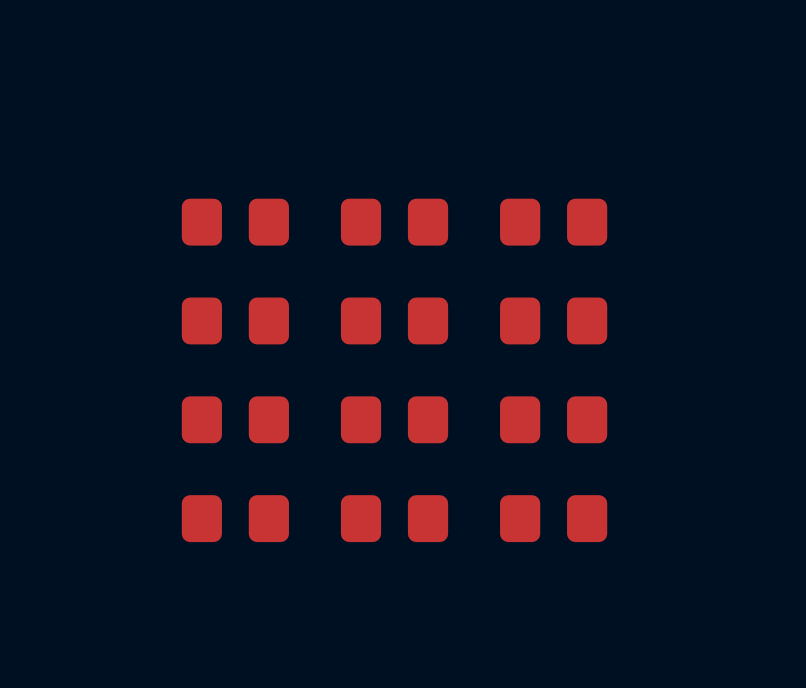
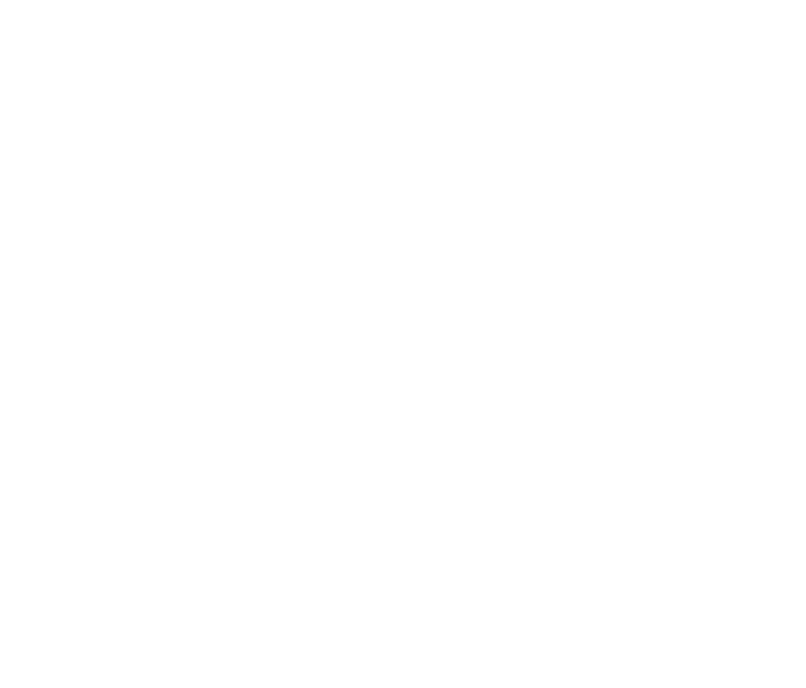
part: (235, 222) -> none
part: (394, 222) -> none
part: (553, 222) -> none
part: (235, 320) -> none
part: (394, 320) -> none
part: (553, 320) -> none
part: (235, 419) -> none
part: (394, 419) -> none
part: (553, 419) -> none
part: (235, 518) -> none
part: (394, 518) -> none
part: (553, 518) -> none

